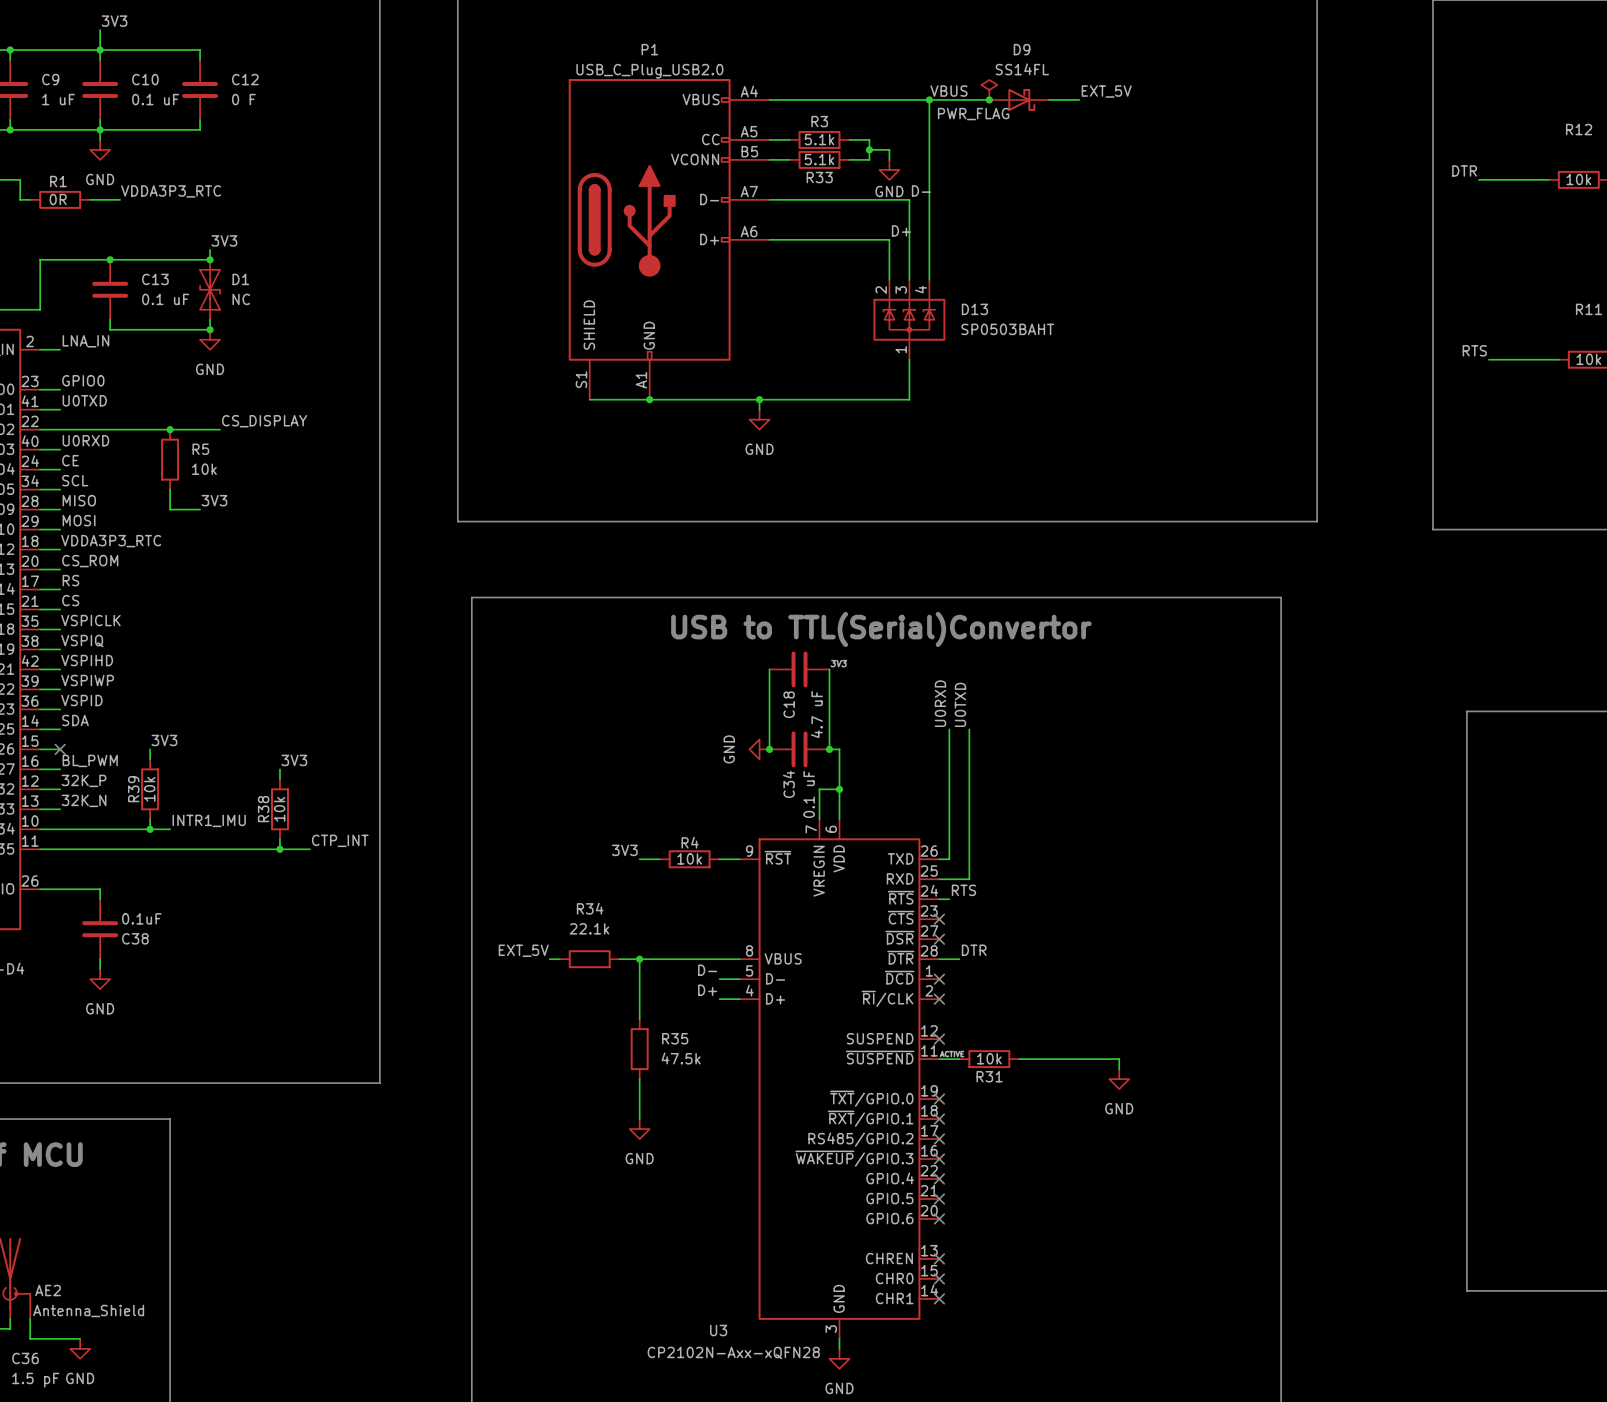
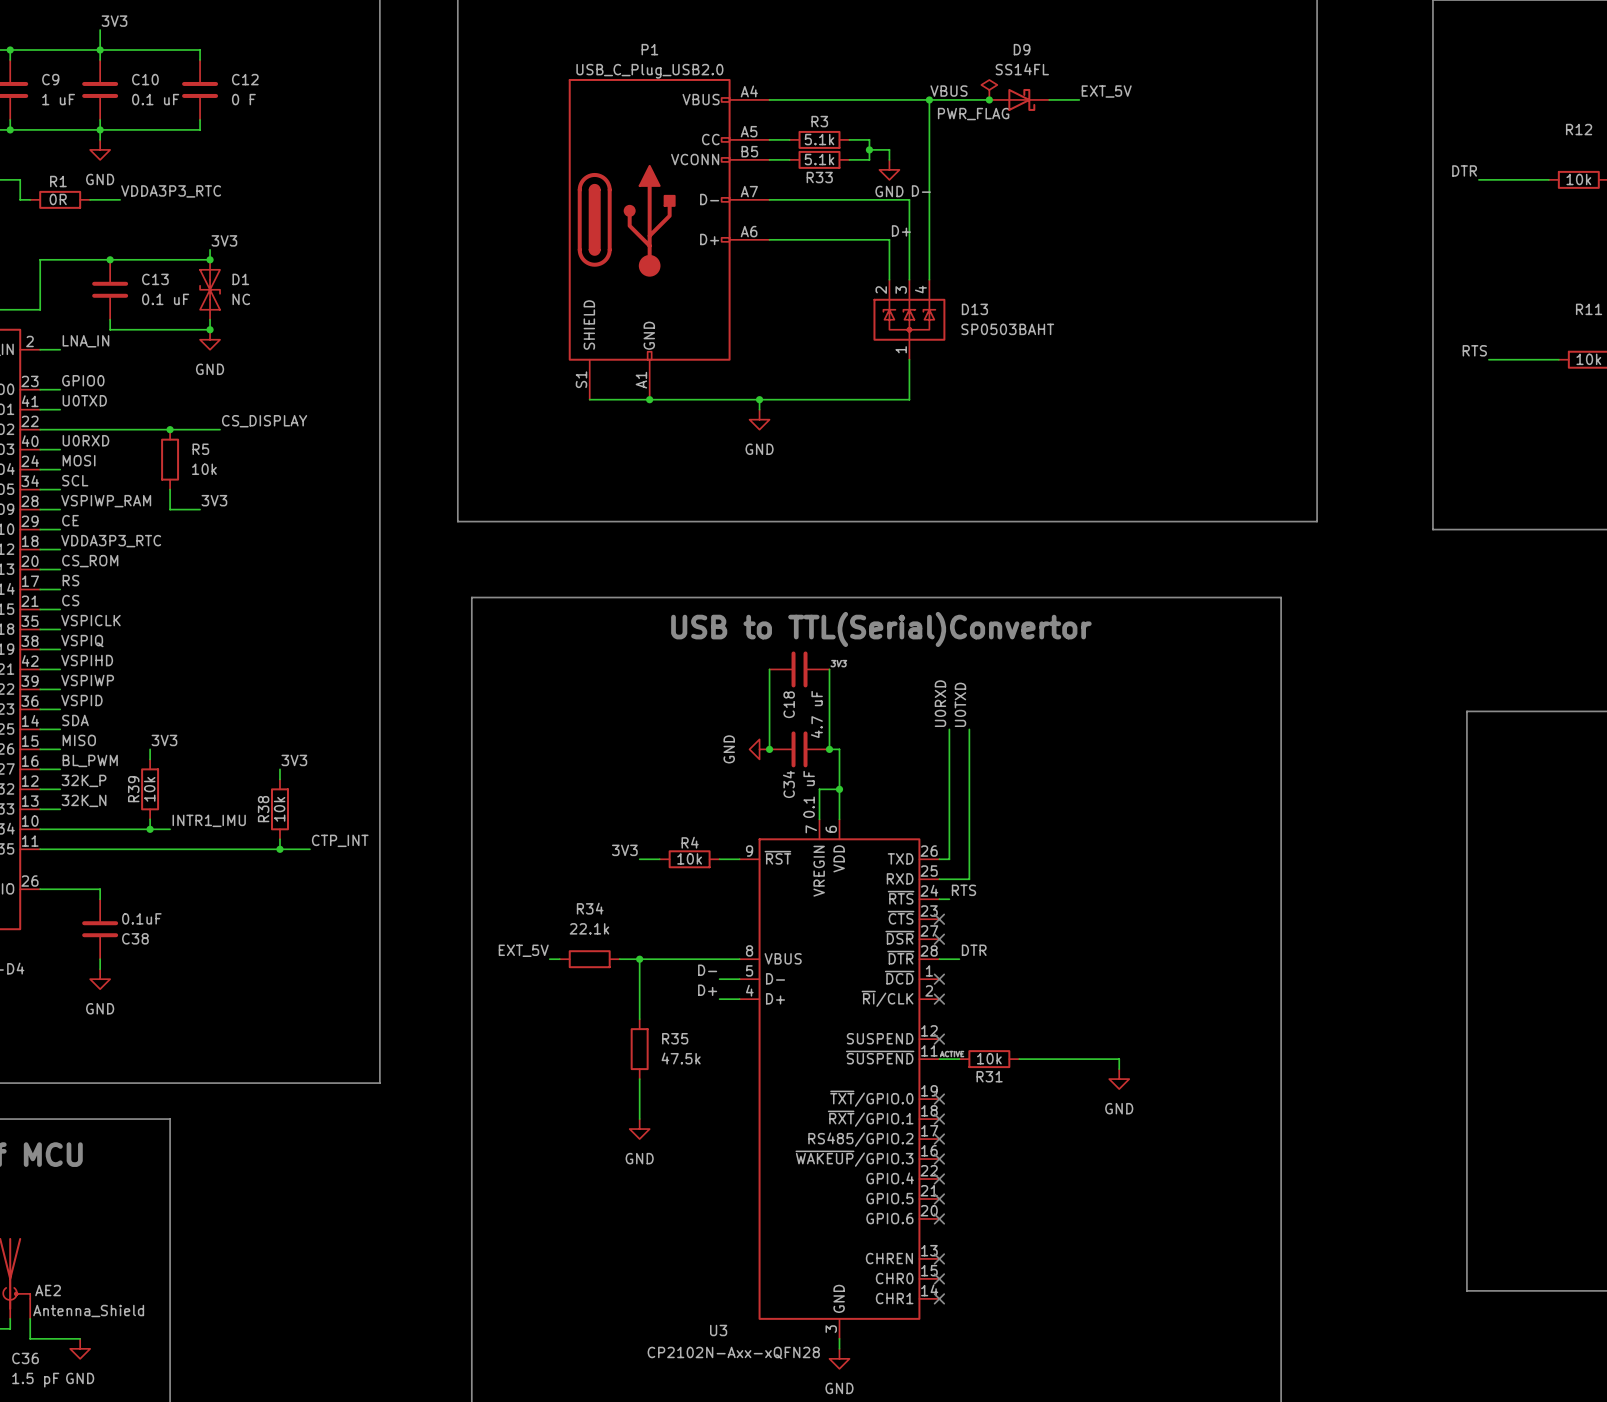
label: CE (70, 460) -> MOSI (79, 460)
label: MISO (79, 500) -> VSPIWP_RAM (106, 501)
label: MOSI (79, 520) -> CE (70, 520)
label: none -> MISO (79, 740)
no-connect mark: (60, 749) -> none

